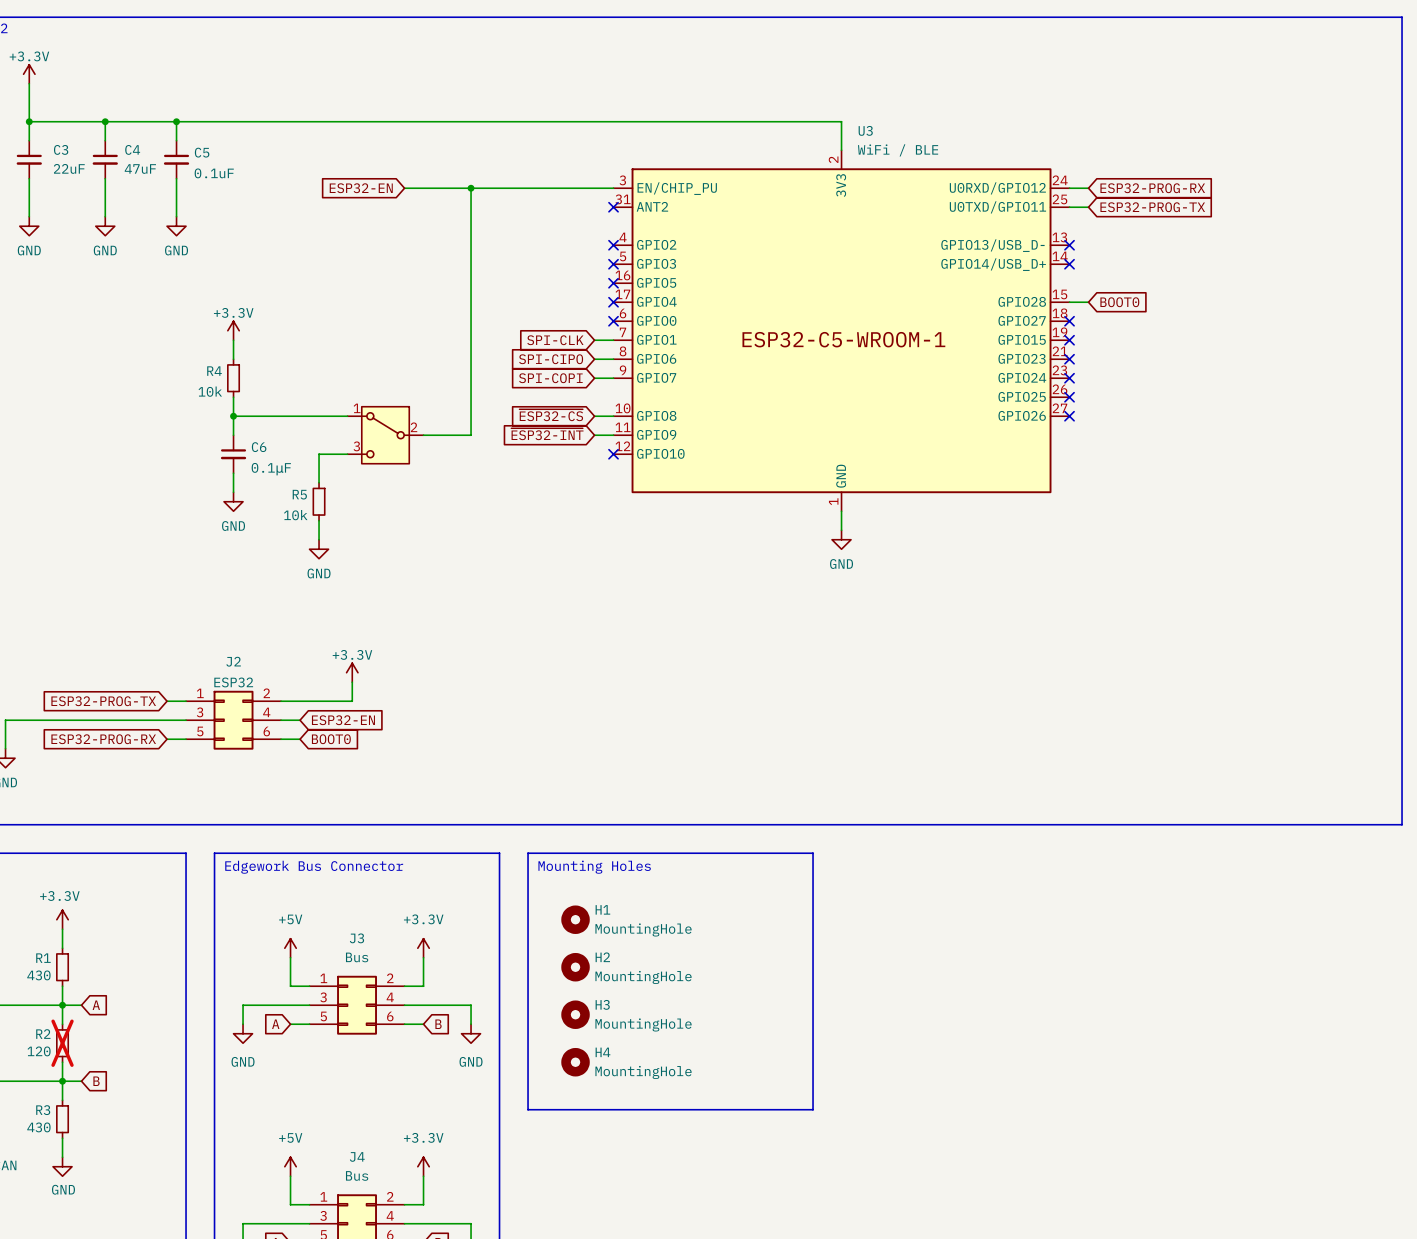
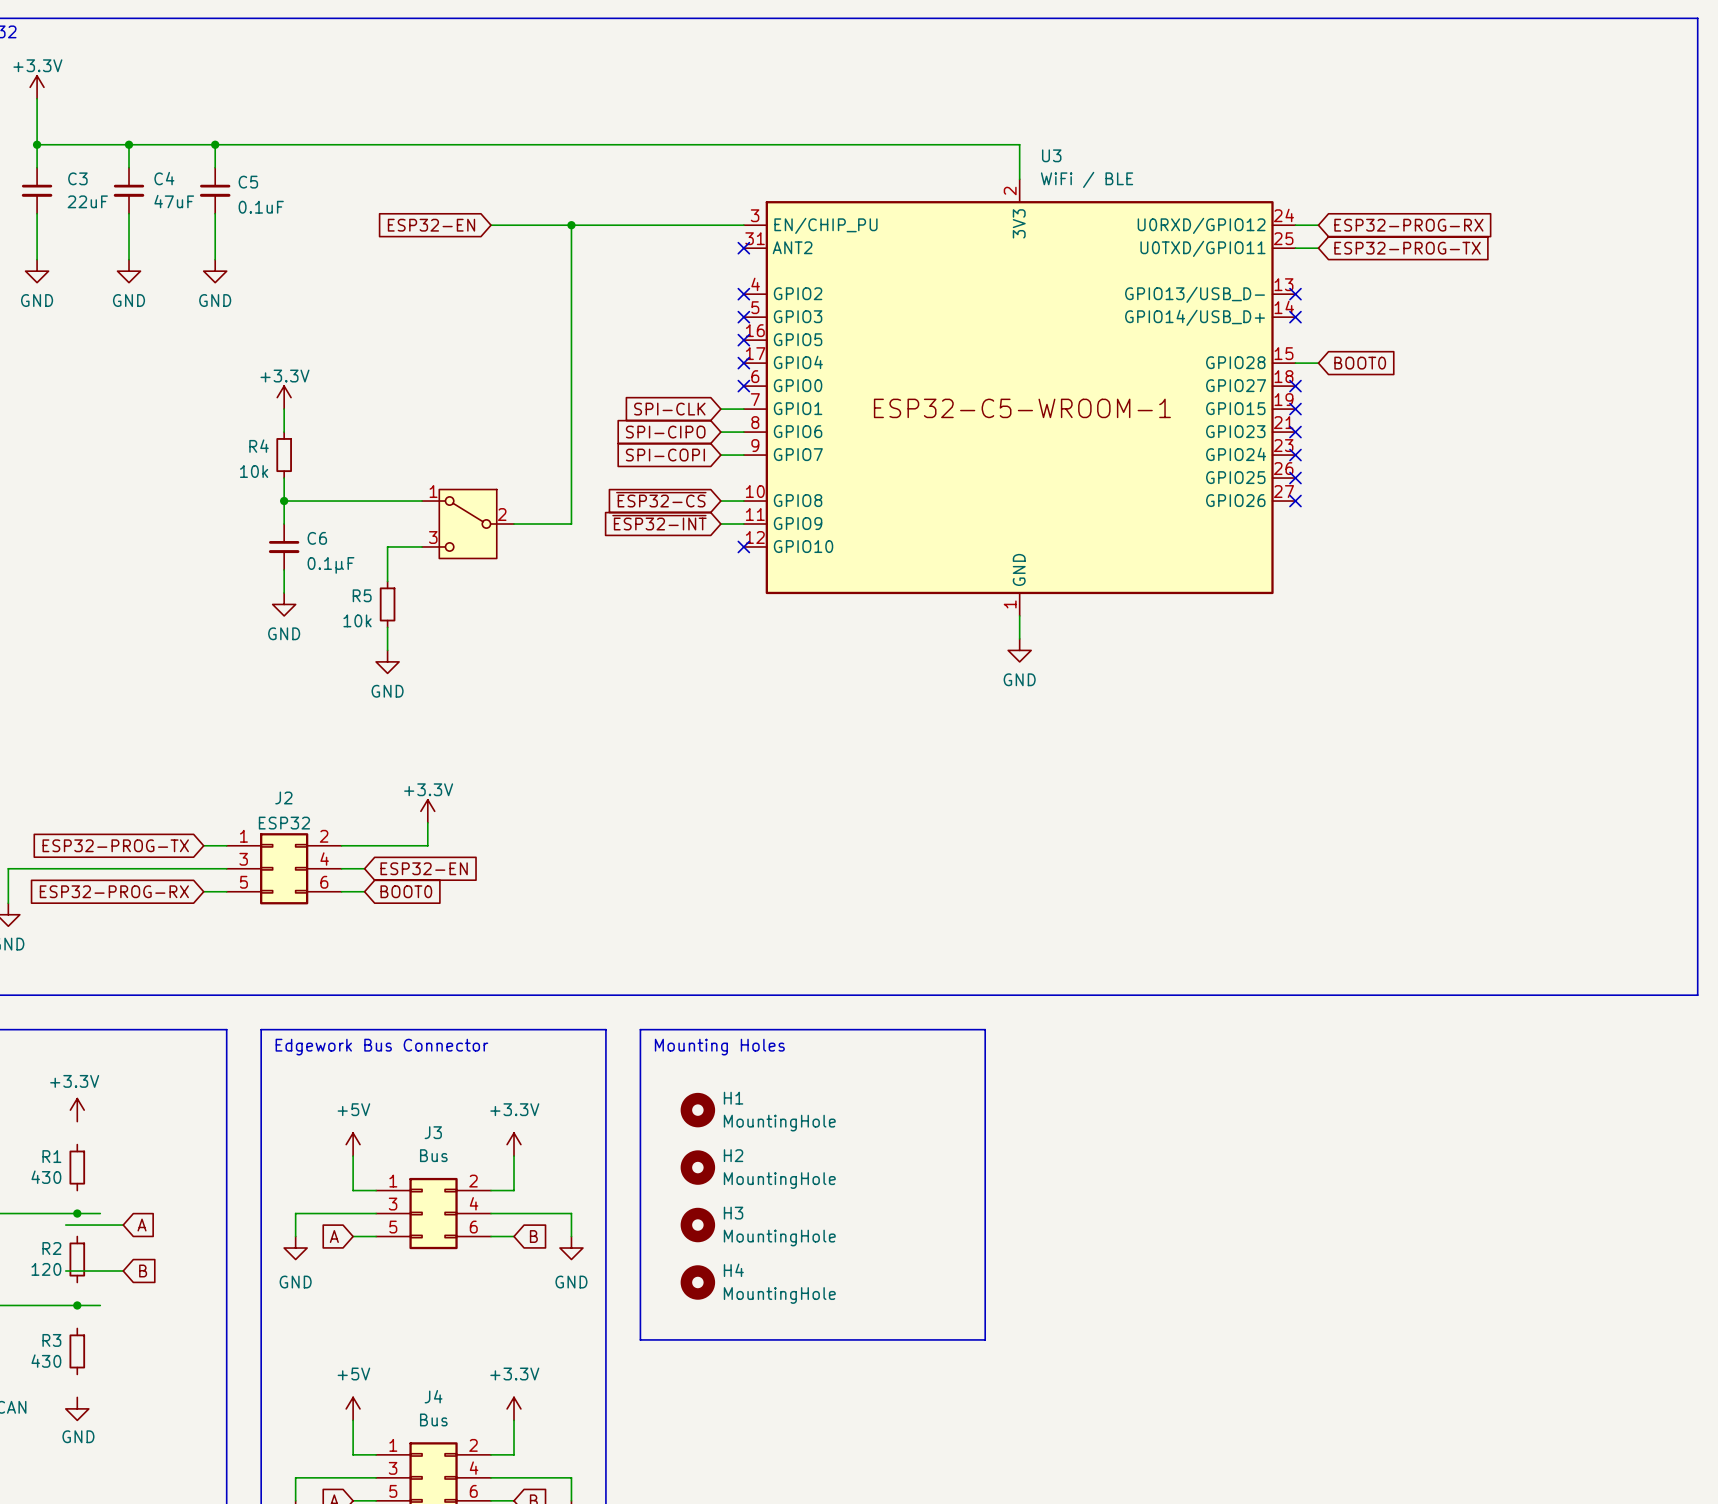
wire: (62, 929) (62, 948) -> none
wire: (62, 986) (62, 1024) -> none
global label position: A (96, 1005) -> A (142, 1225)
wire: none -> (65, 1225) (123, 1225)
R2 do-not-place cross: (62, 1043) -> none
wire: none -> (65, 1271) (123, 1271)
wire: (62, 1062) (62, 1100) -> none
global label position: B (96, 1081) -> B (143, 1271)
wire: (62, 1138) (62, 1157) -> none

